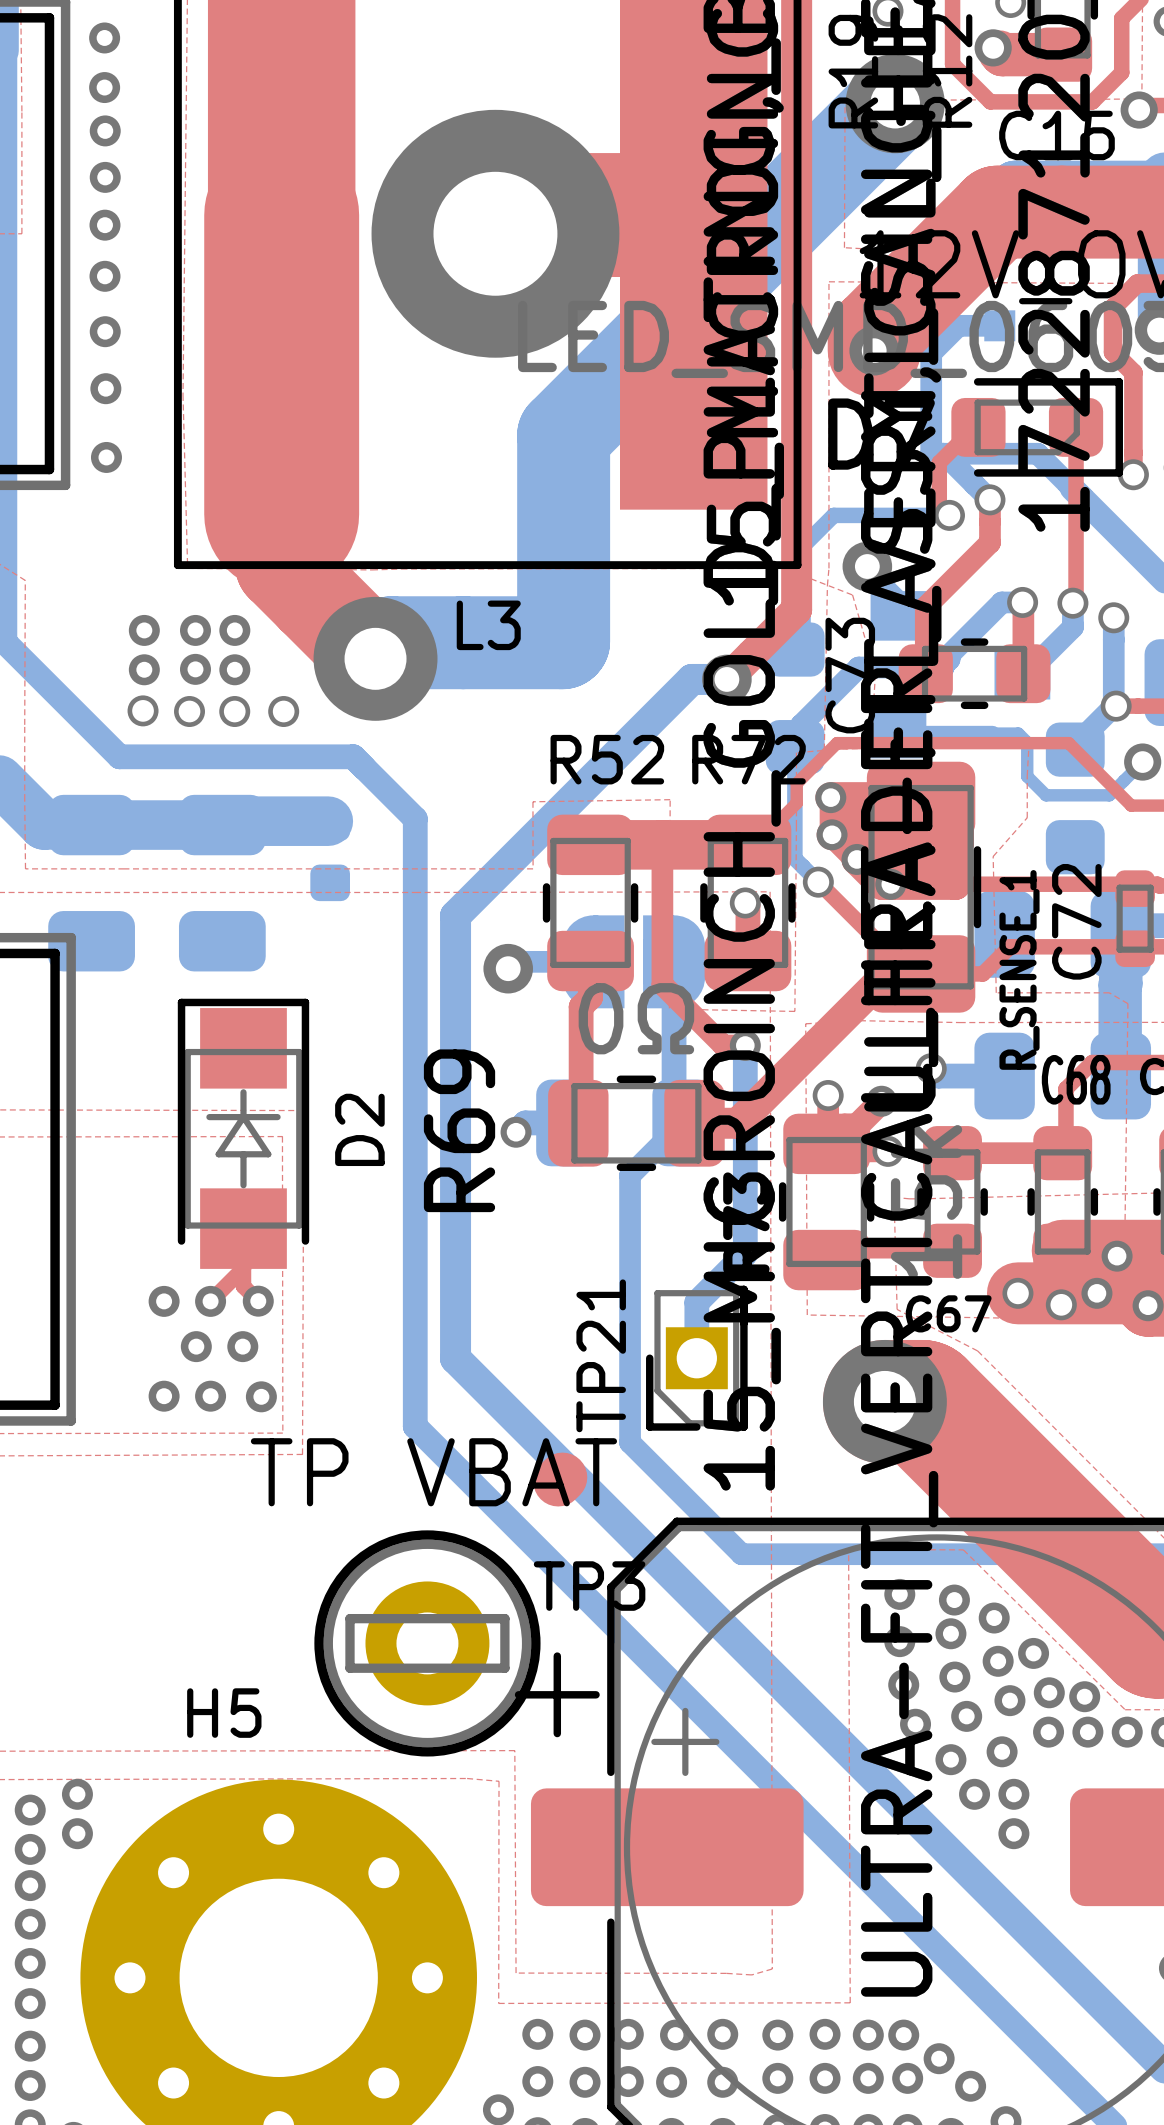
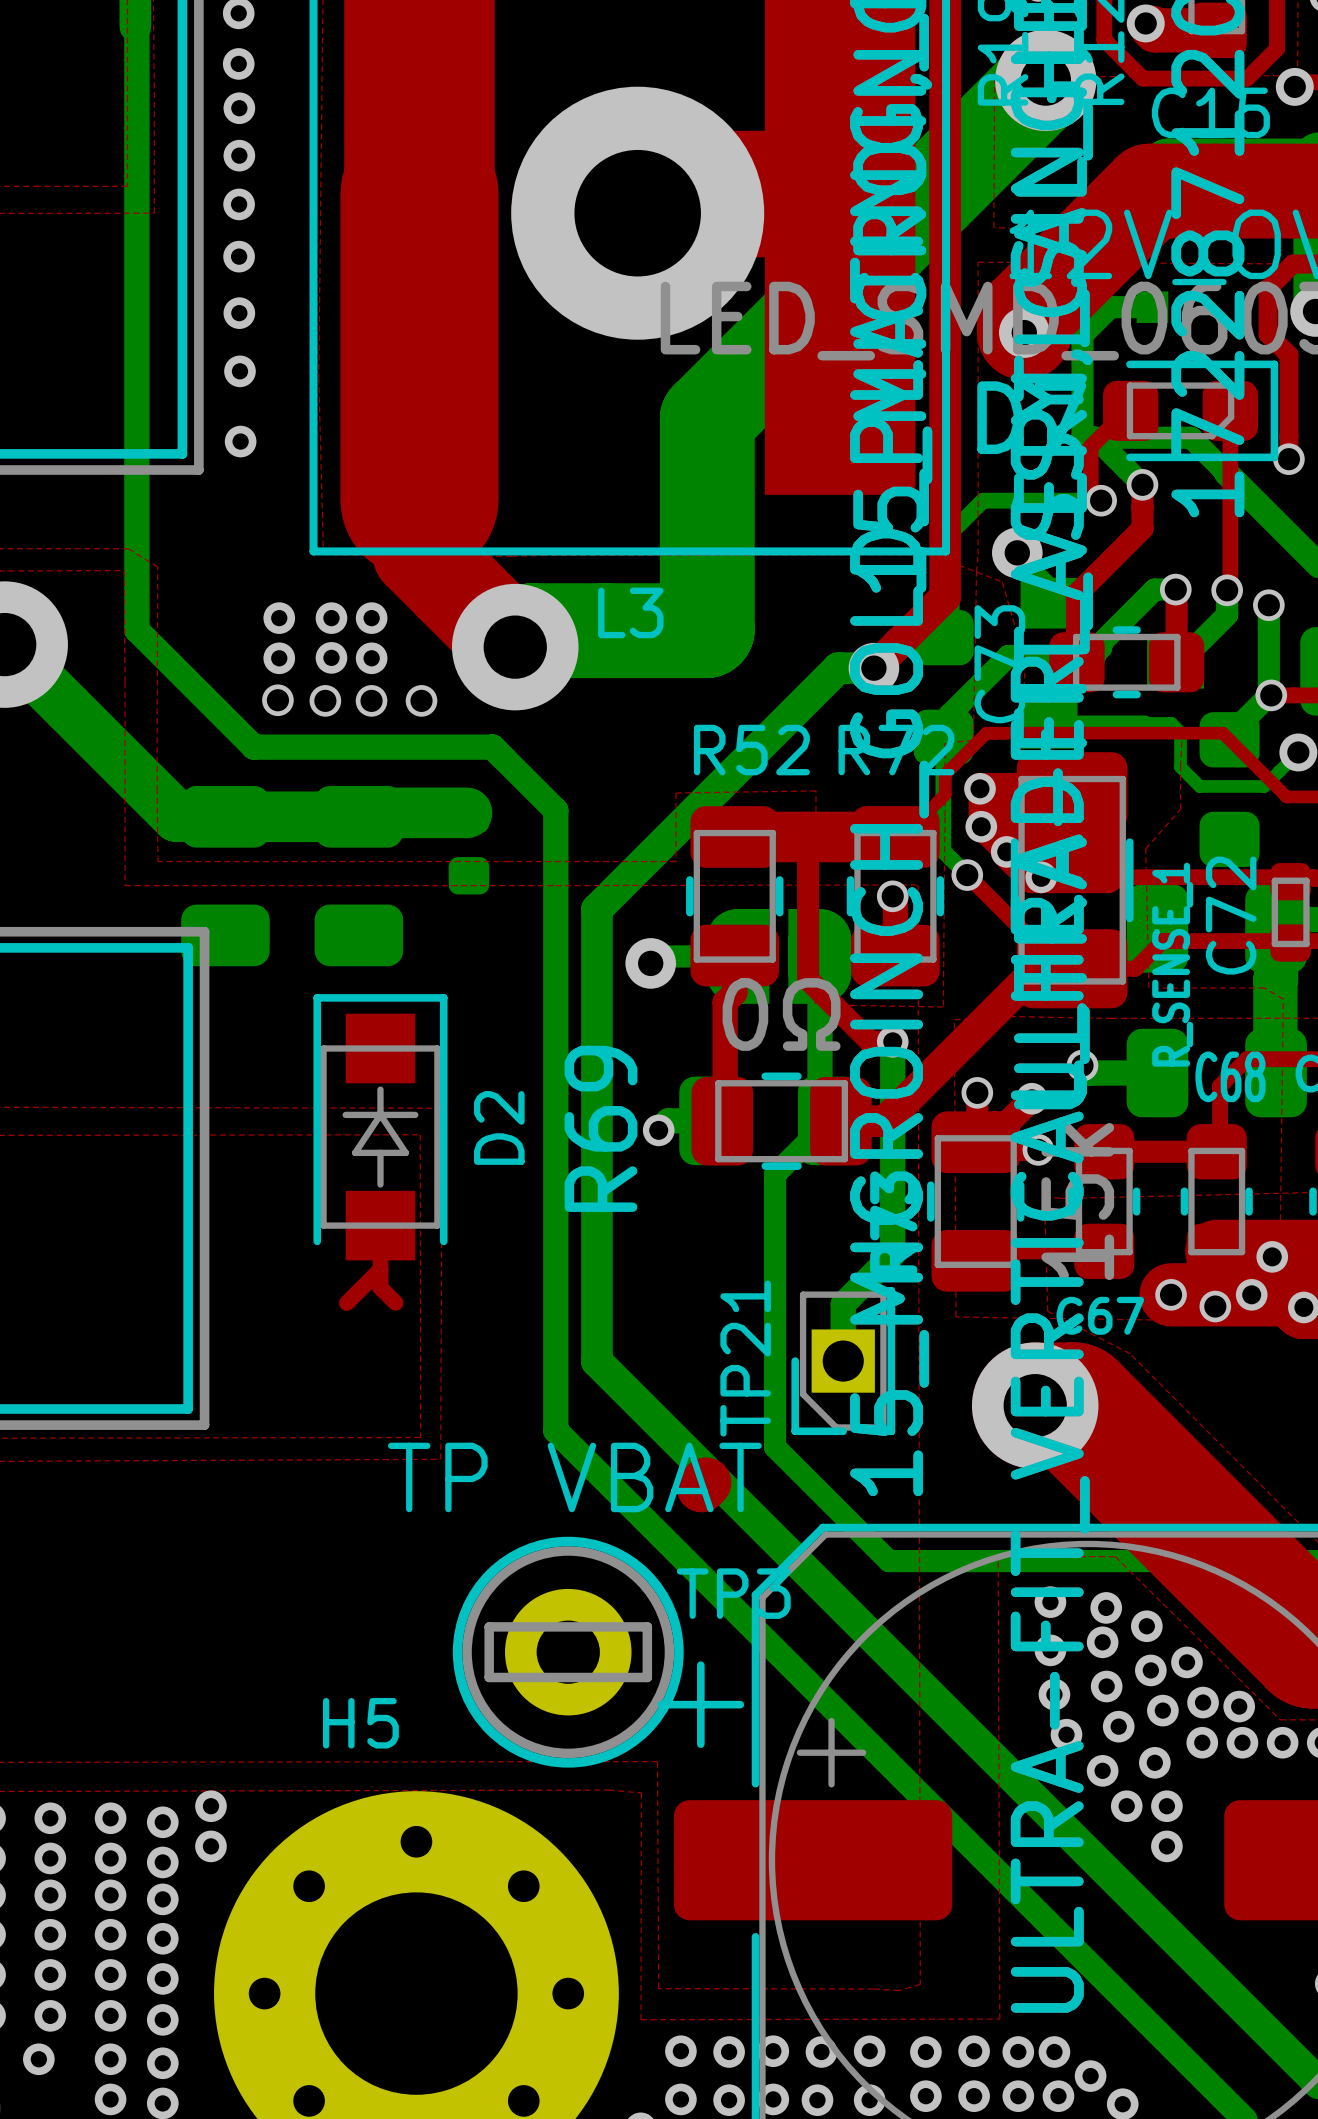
D2 footprint: [177, 998, 310, 1269] -> [313, 994, 448, 1261]
via: (164, 1301) -> none
via: (210, 1301) -> none
via: (258, 1301) -> none
via: (196, 1346) -> none
via: (242, 1346) -> none
via: (164, 1396) -> none
via: (210, 1396) -> none
via: (261, 1396) -> none

